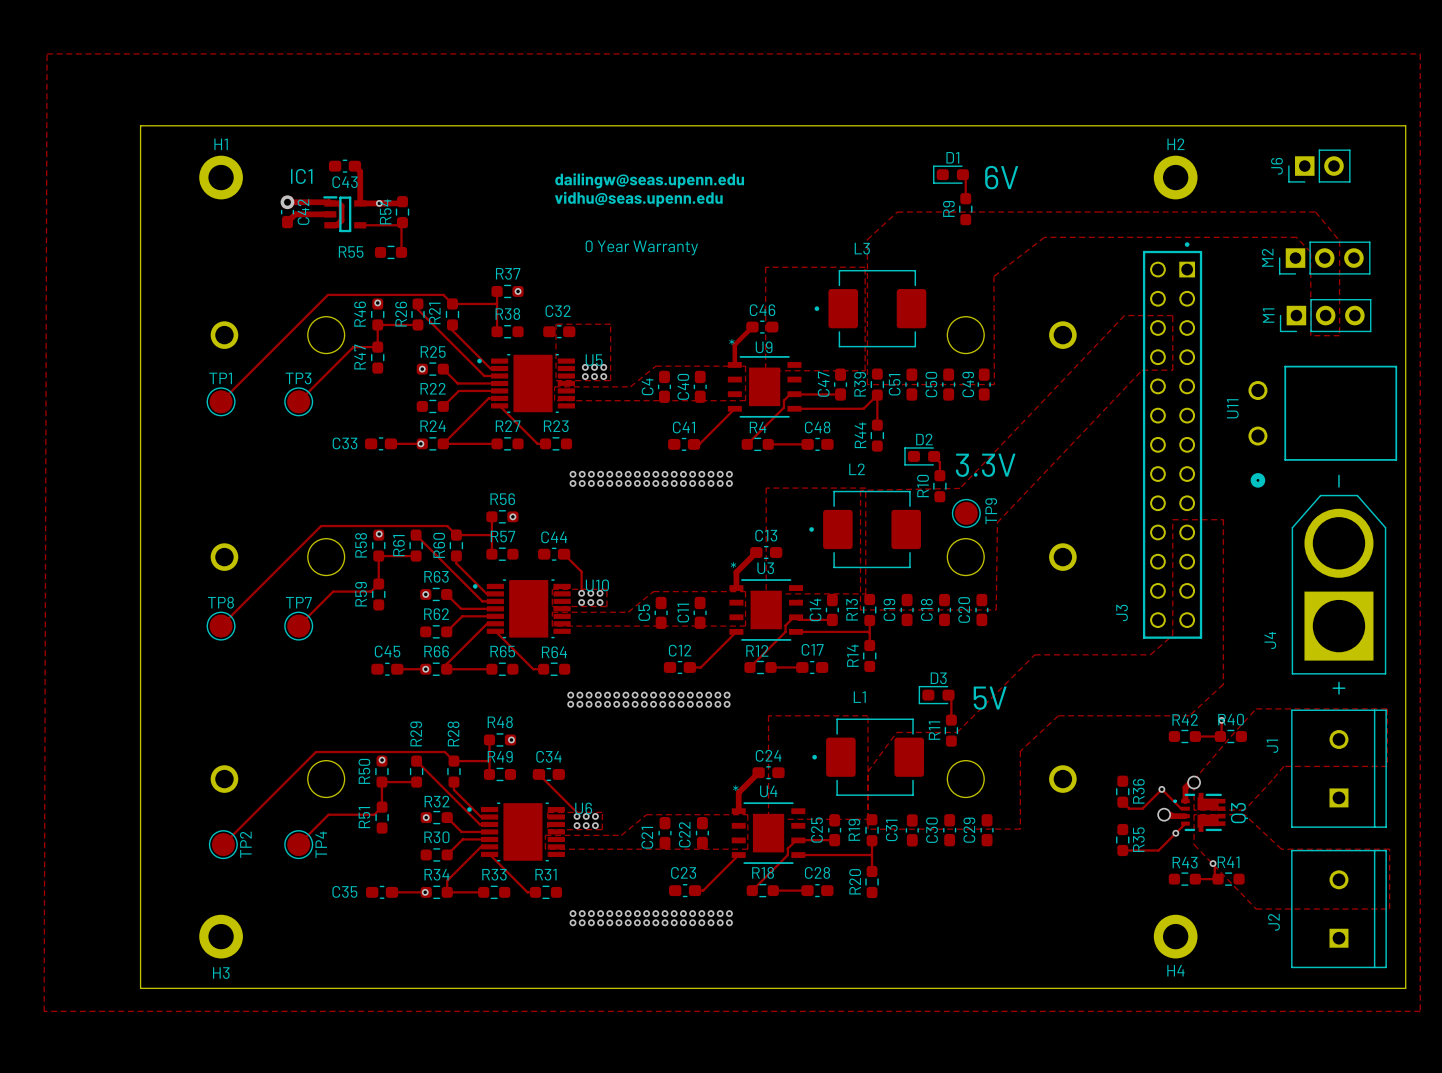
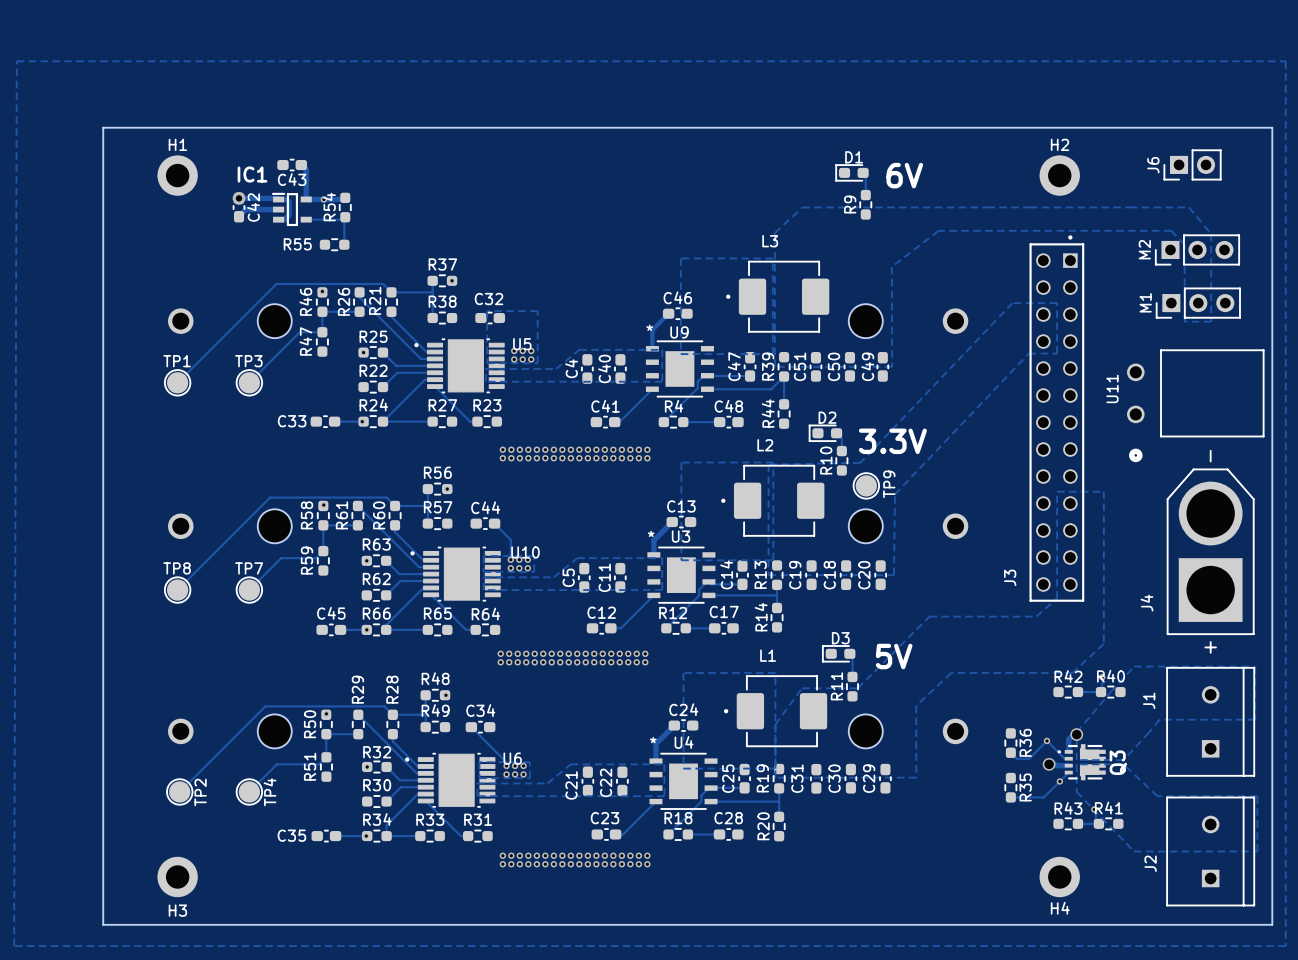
text: dailingw@seas.upenn.edu (649, 180) -> none
text: vidhu@seas.upenn.edu (638, 199) -> none
text: 0 Year Warranty (641, 247) -> none

